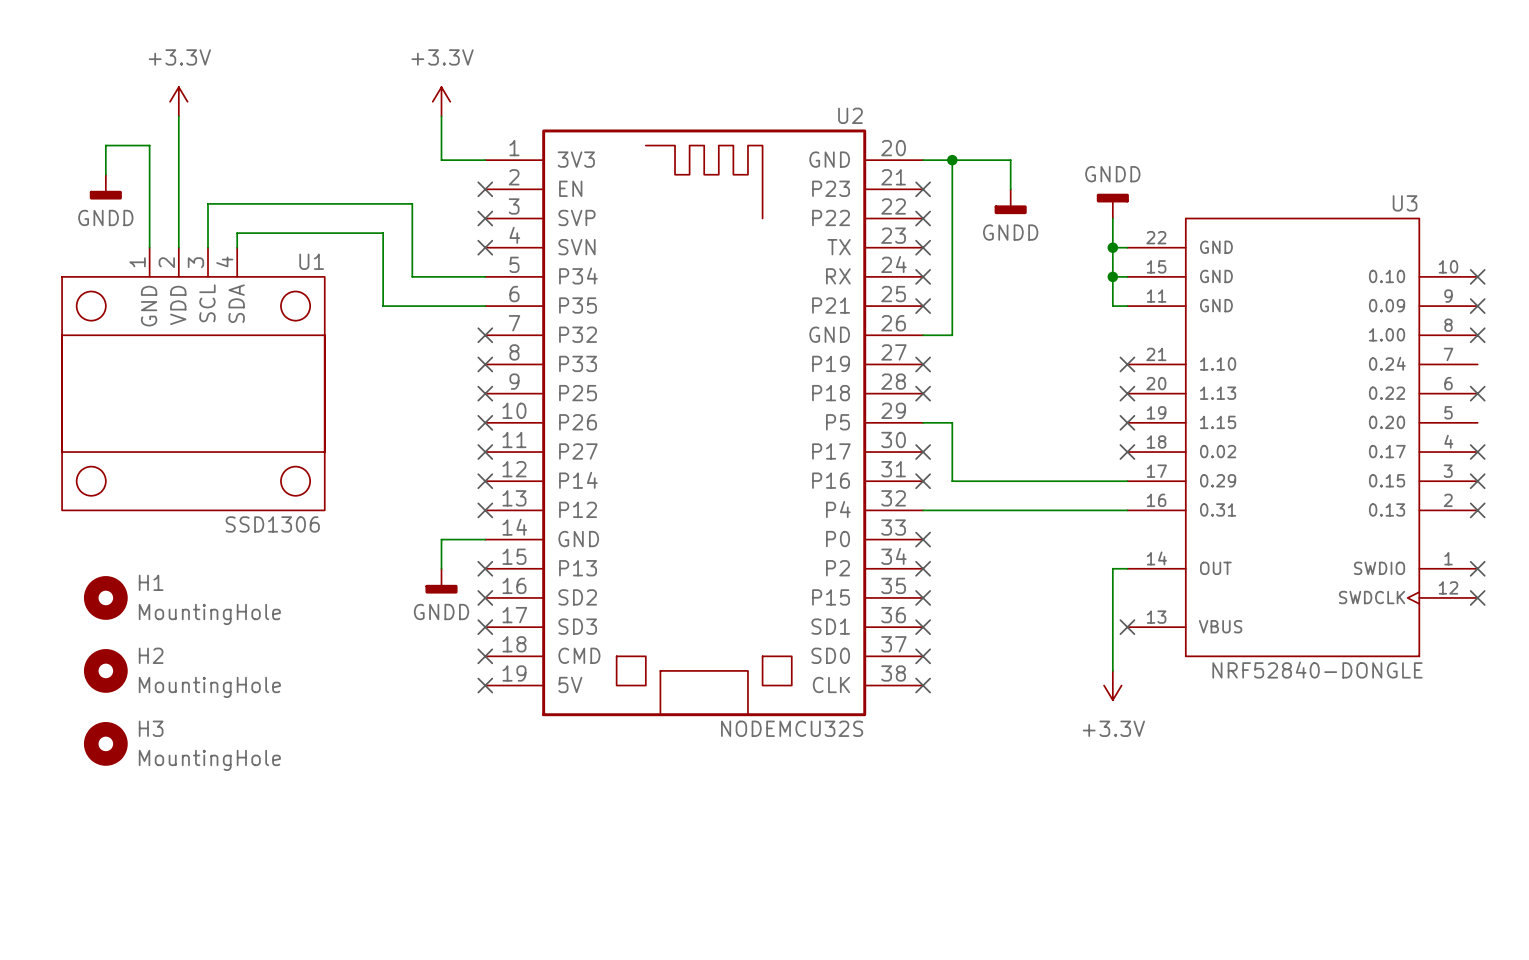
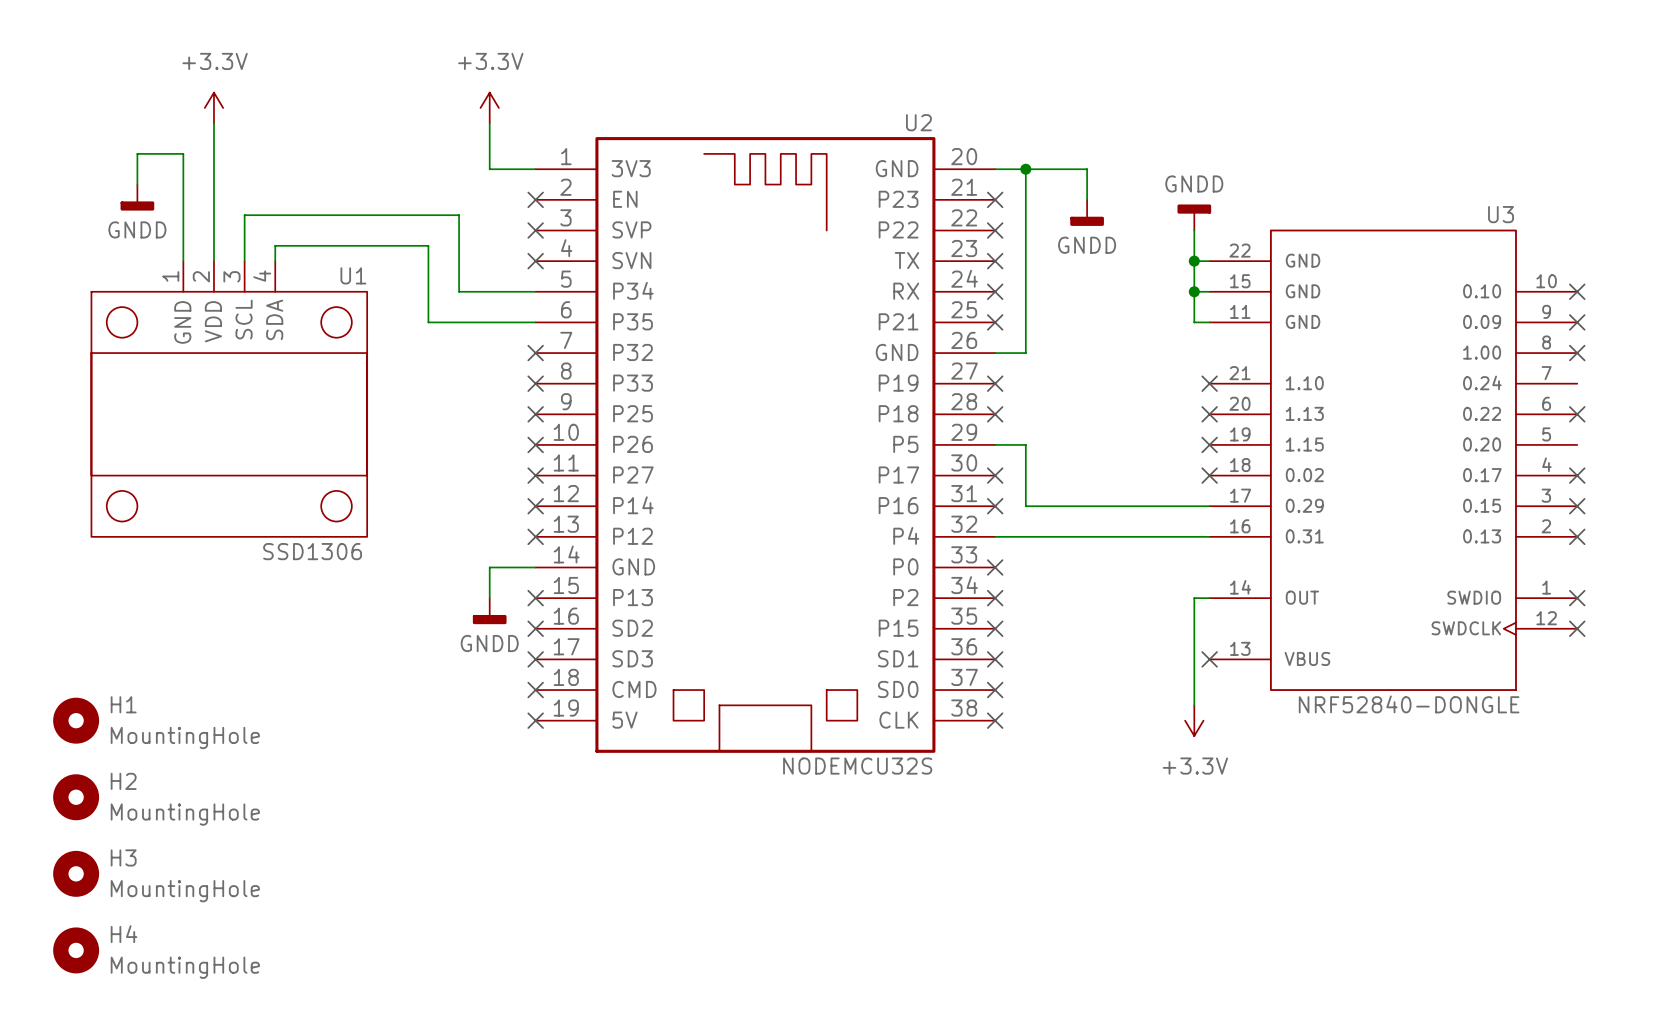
H1 position: (105, 597) -> (76, 720)
H2 position: (105, 670) -> (76, 797)
H3 position: (105, 743) -> (76, 873)
H4: none -> MountingHole (76, 950)

